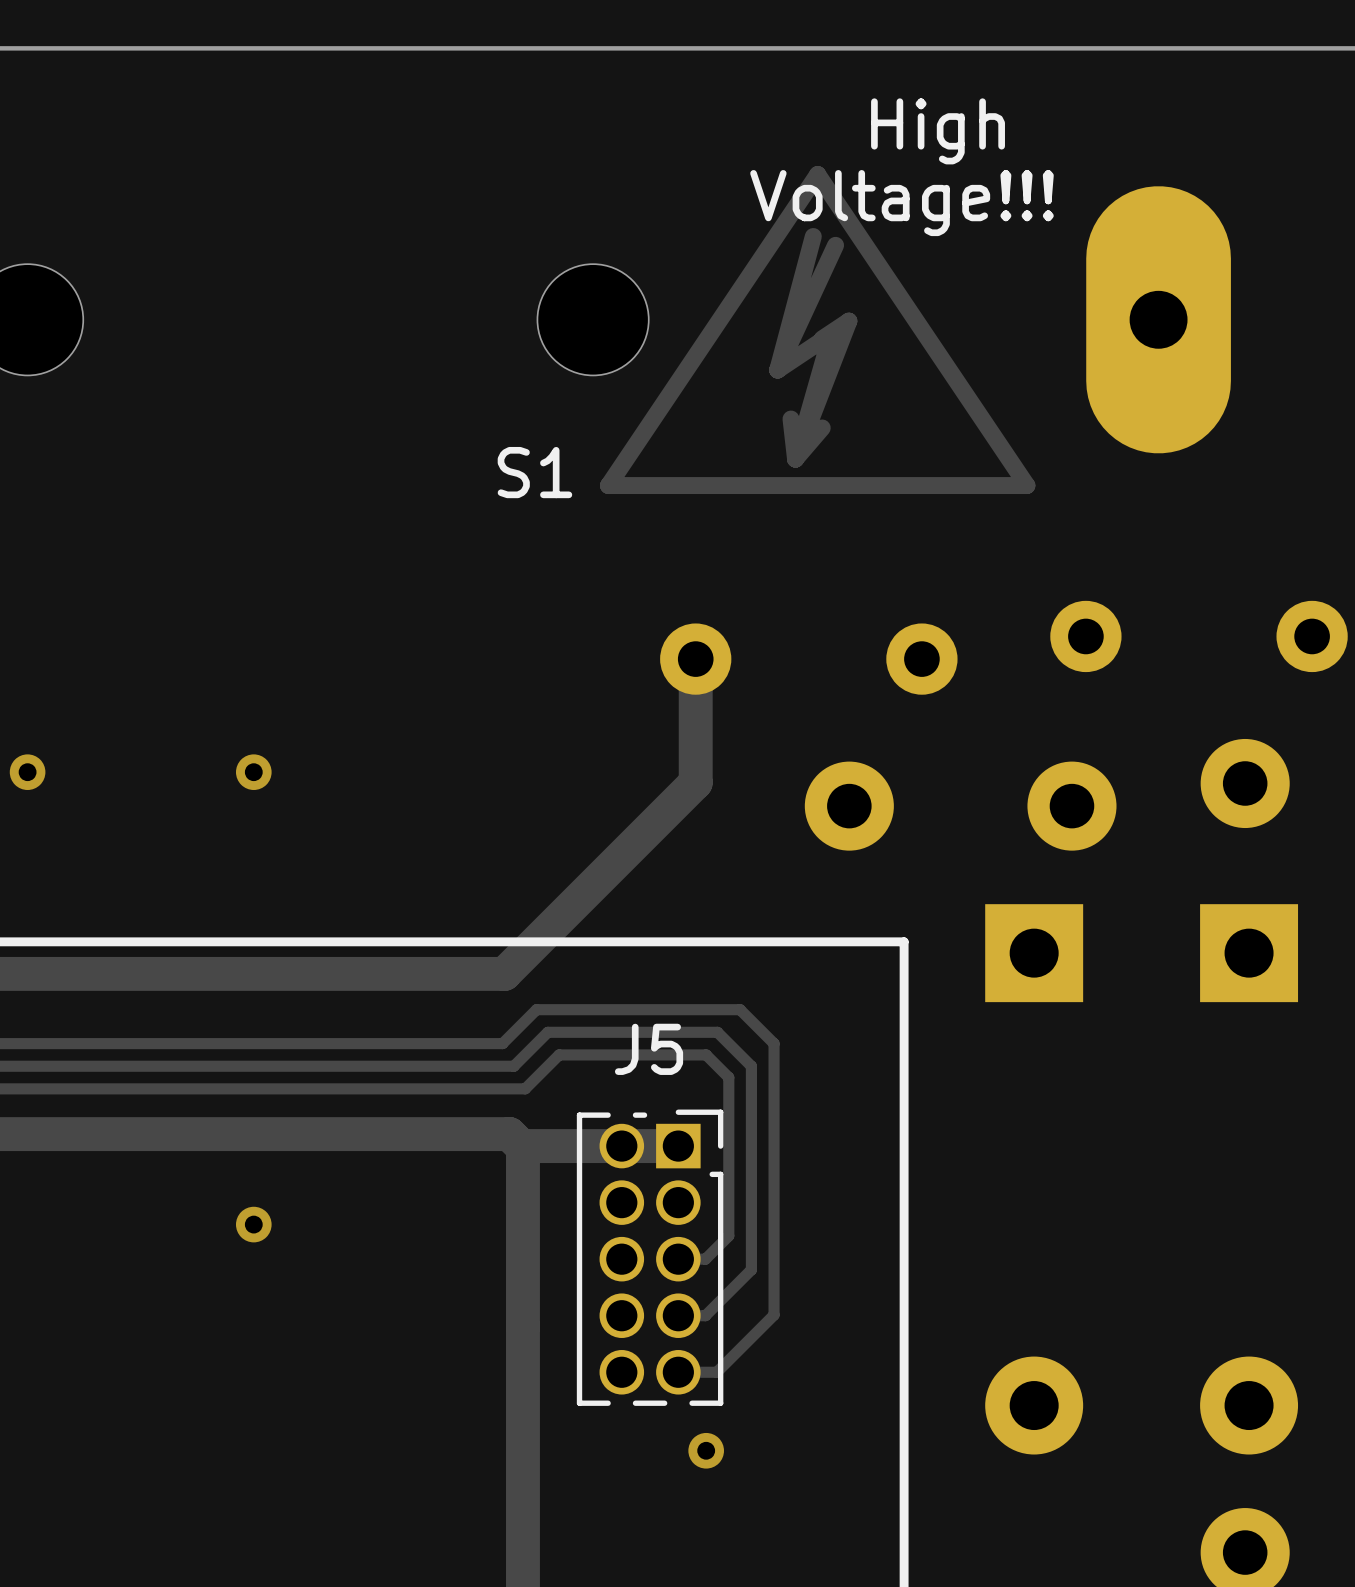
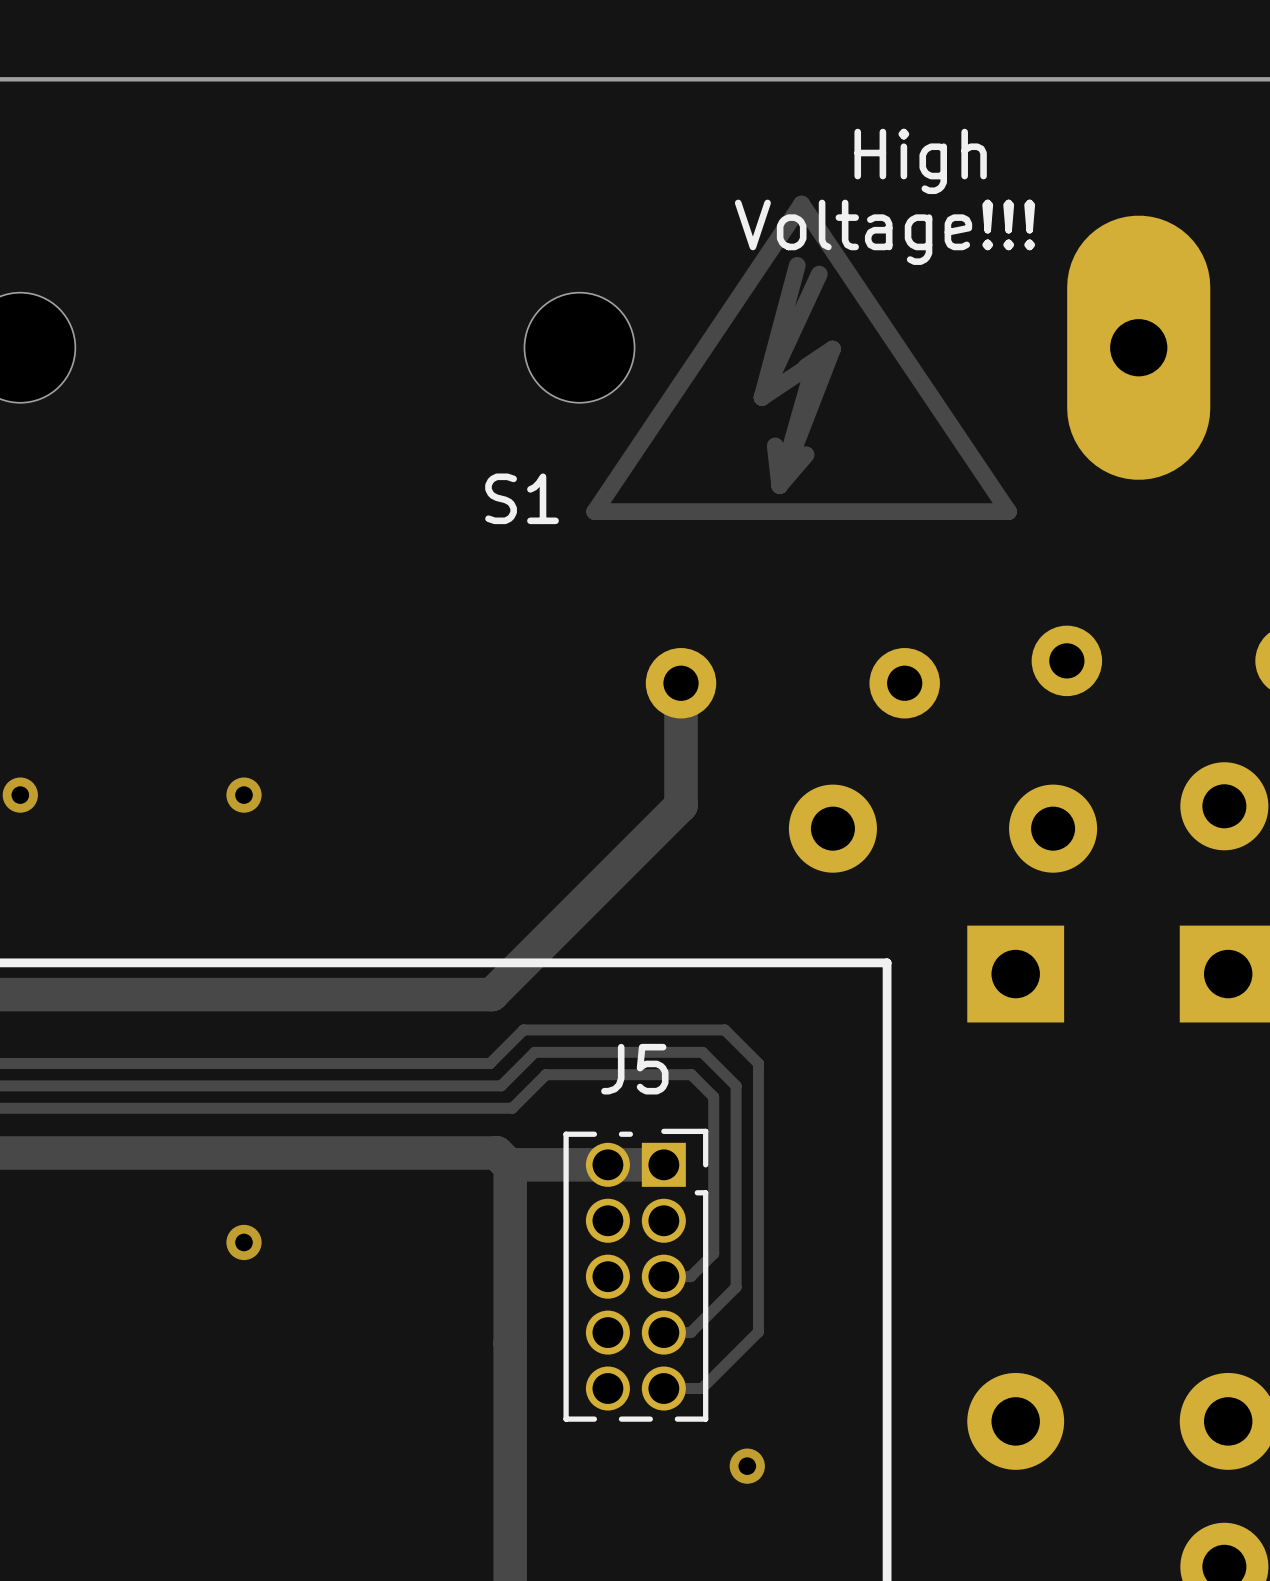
via position: (706, 1450) -> (747, 1466)

